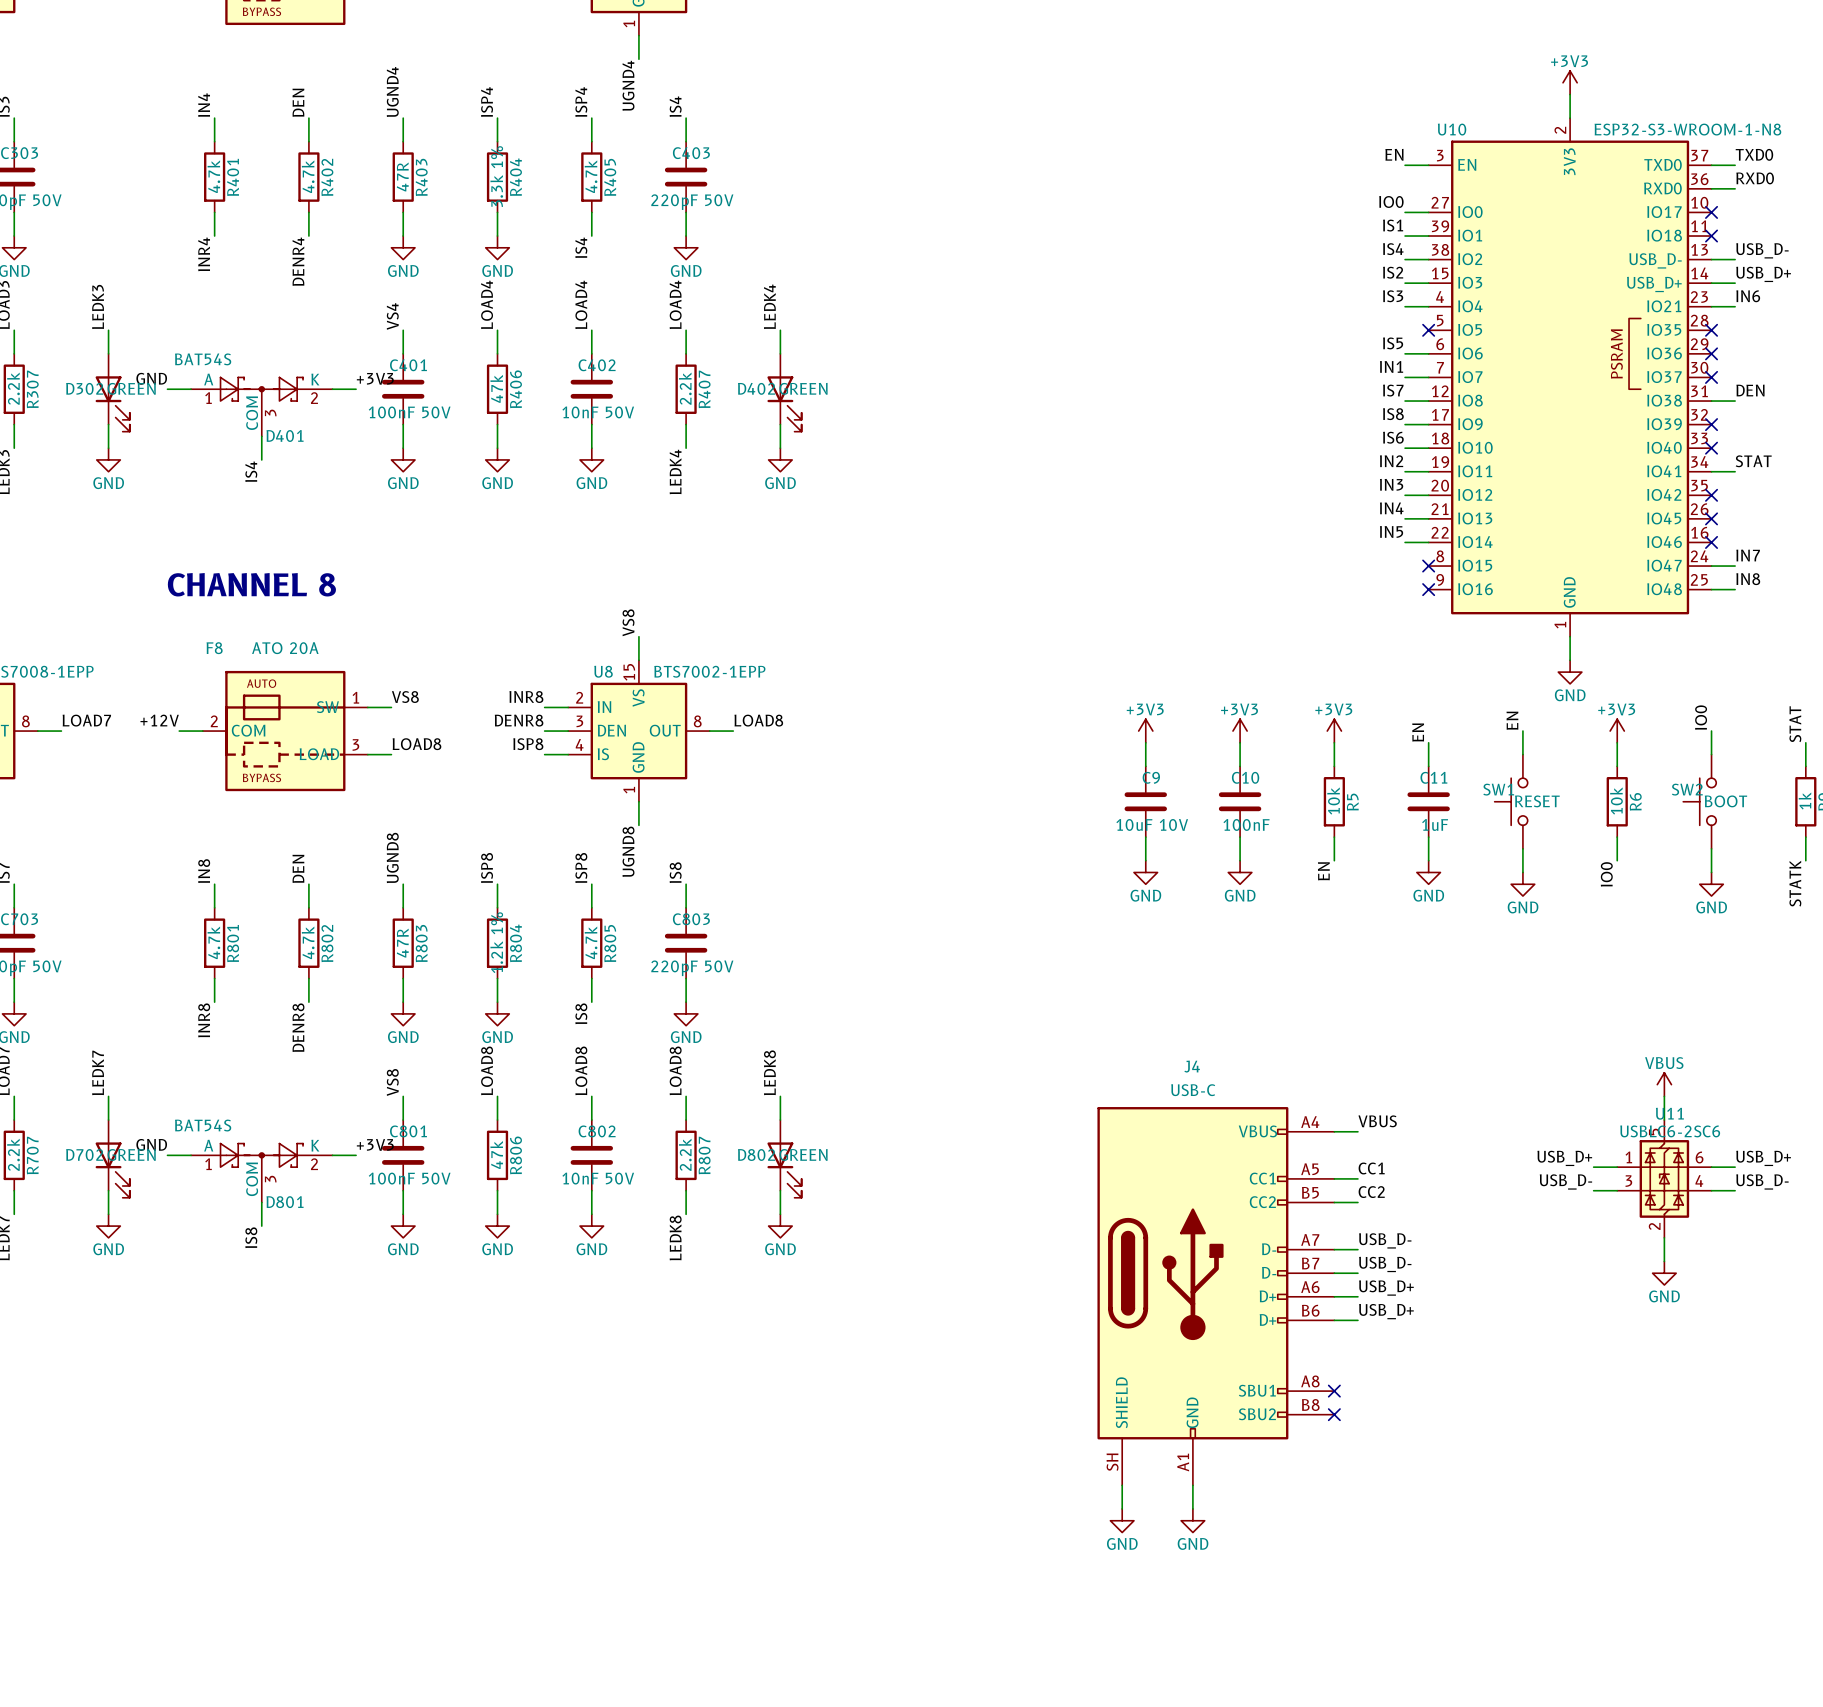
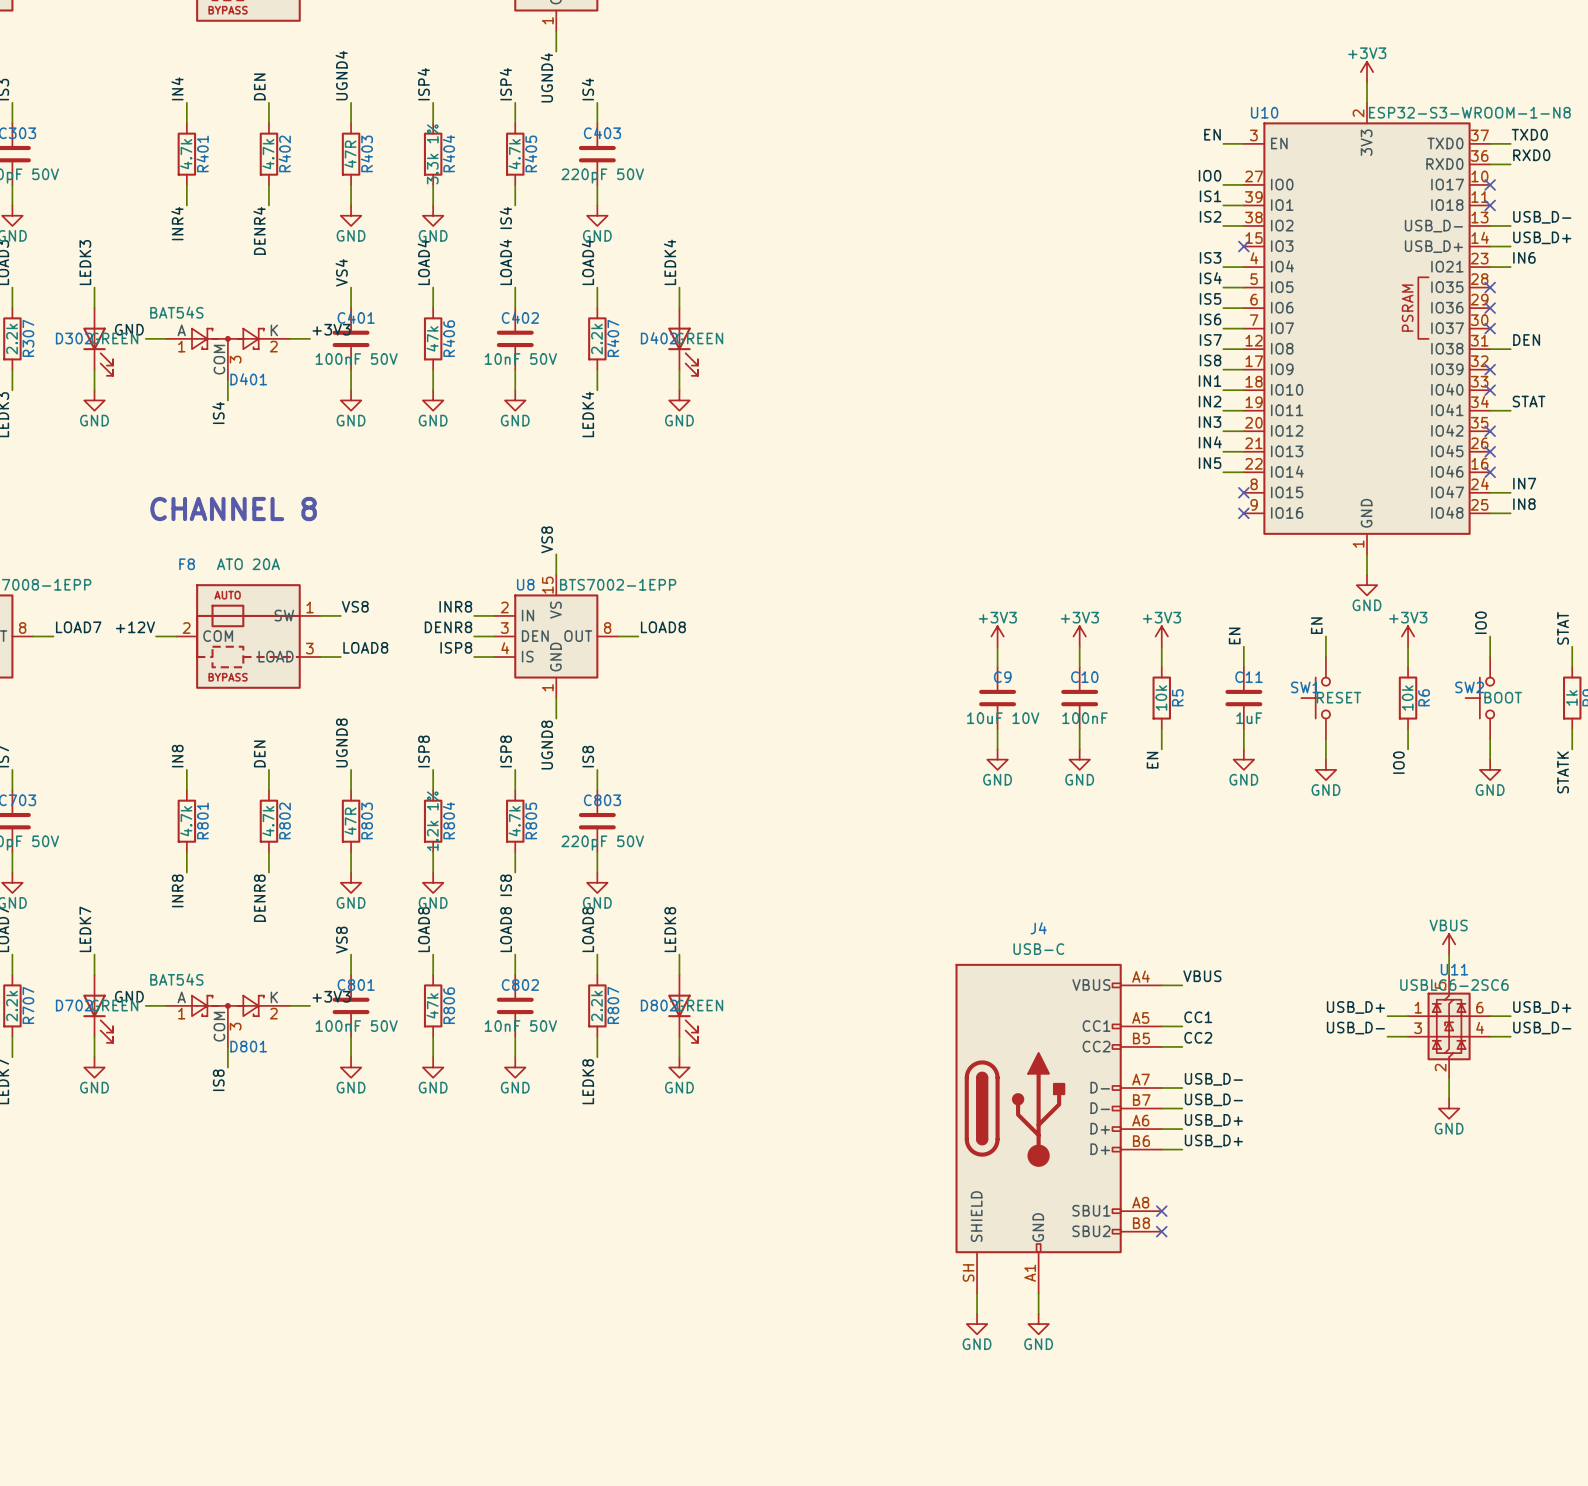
label: IS4 (1393, 249) -> IS2 (1210, 216)
label: IS2 (1393, 272) -> none
wire: (1405, 283) (1428, 283) -> (1223, 287) (1243, 287)
label: none -> IS4 (1210, 278)
no-connect mark position: (1428, 330) -> (1243, 246)
label: IN1 (1391, 366) -> IS6 (1210, 319)
label: IS6 (1393, 437) -> IN1 (1210, 381)

